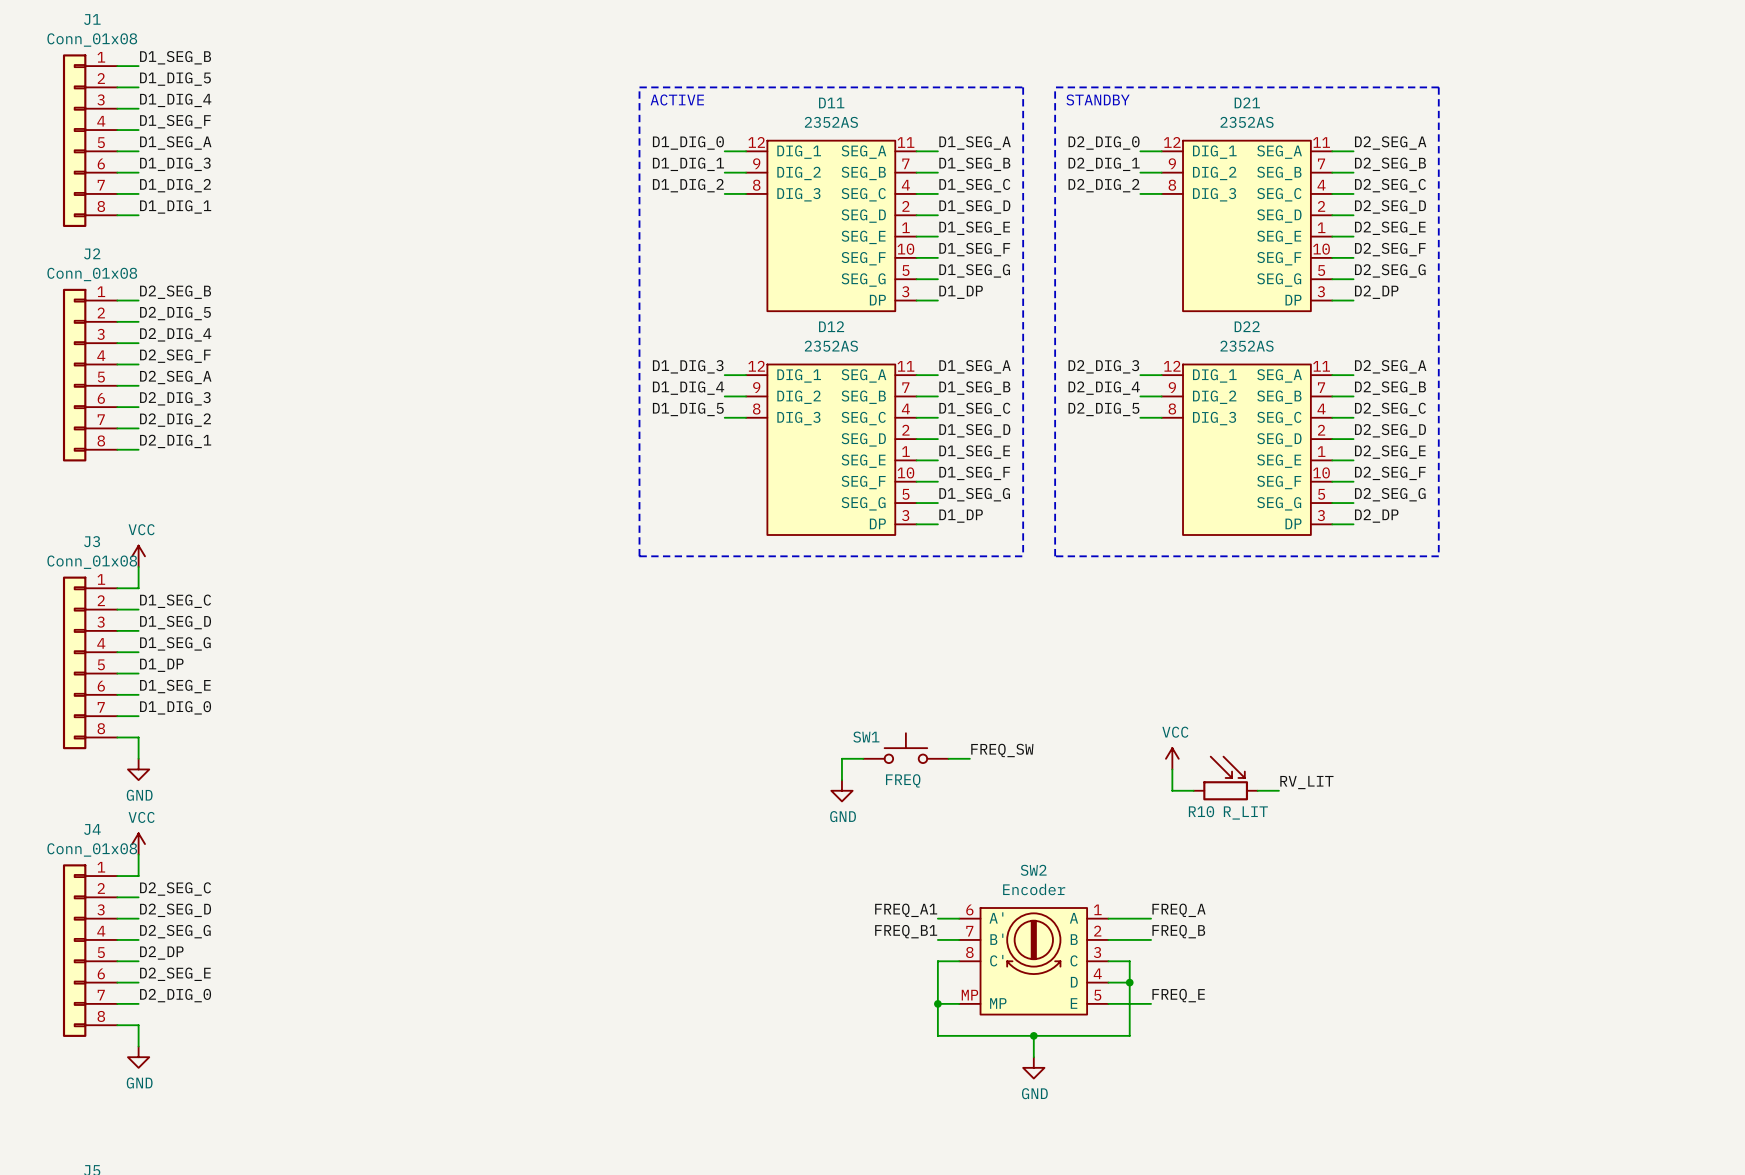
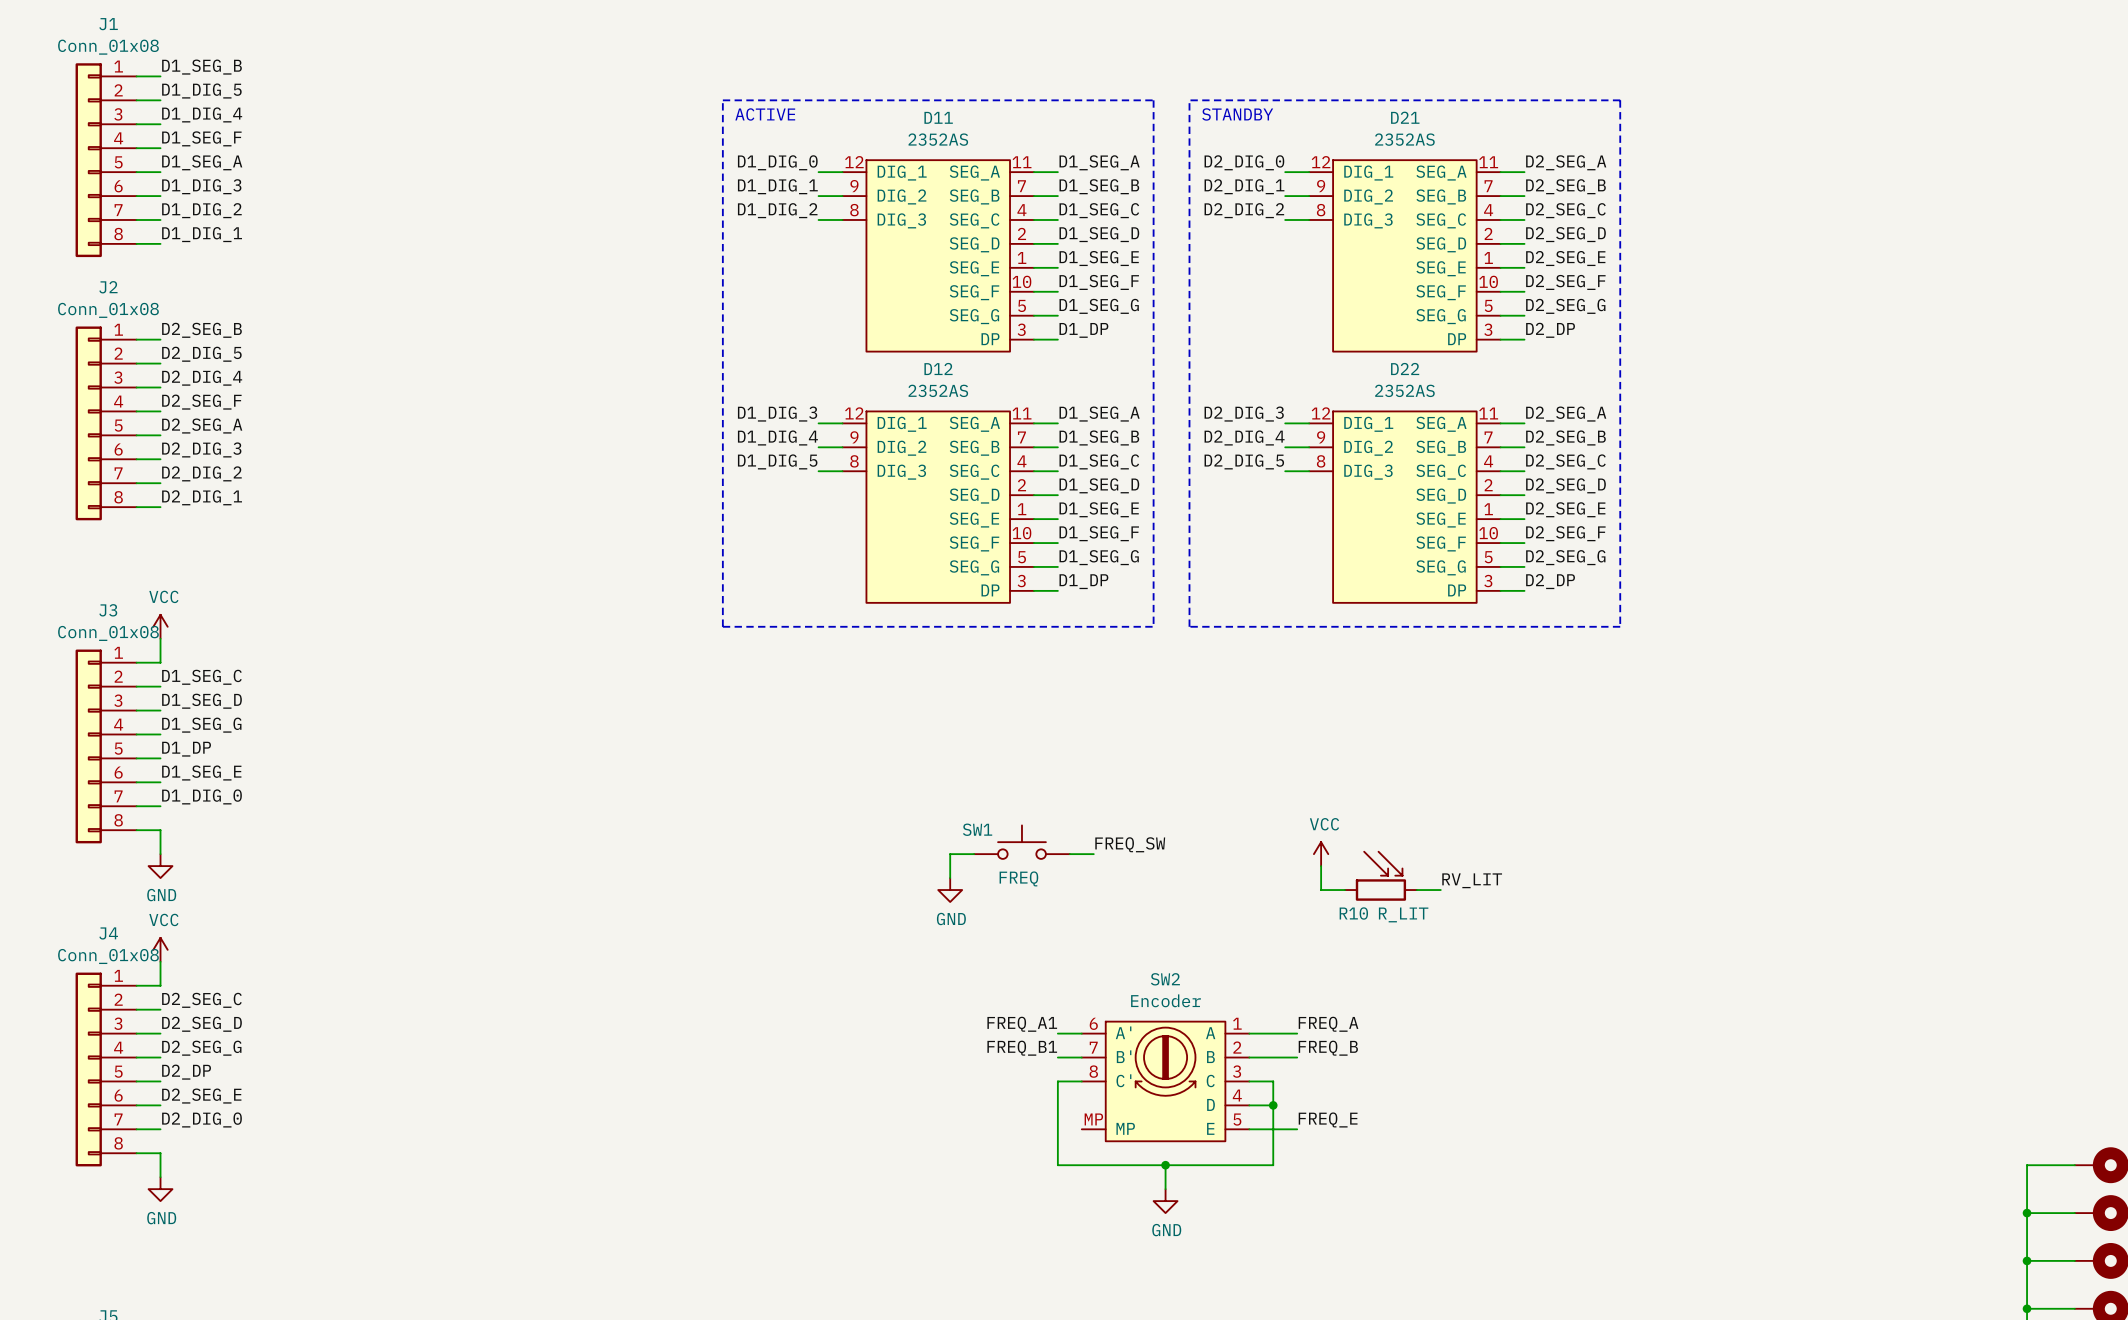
wire: (937, 1003) (959, 1003) -> none
junction: (937, 1003) -> none

